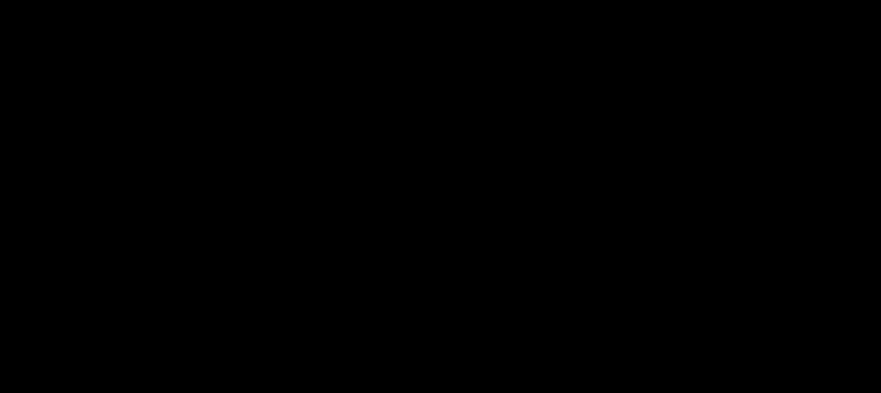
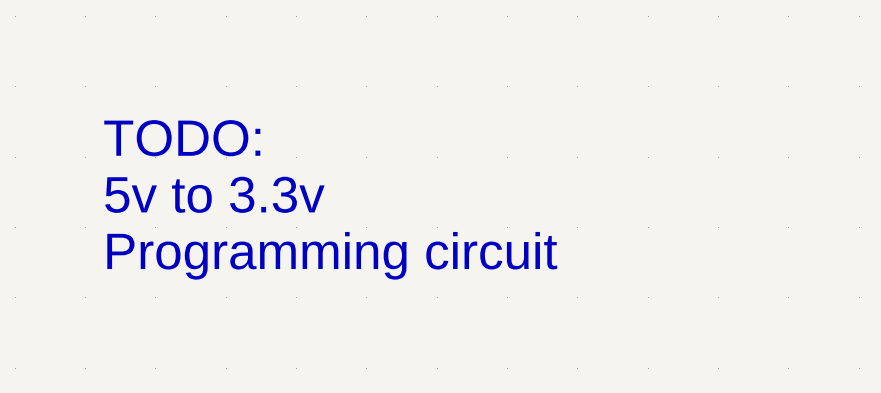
text: none -> TODO: (182, 138)
text: none -> 5v to 3.3v (214, 194)
text: none -> Programming circuit (332, 255)

